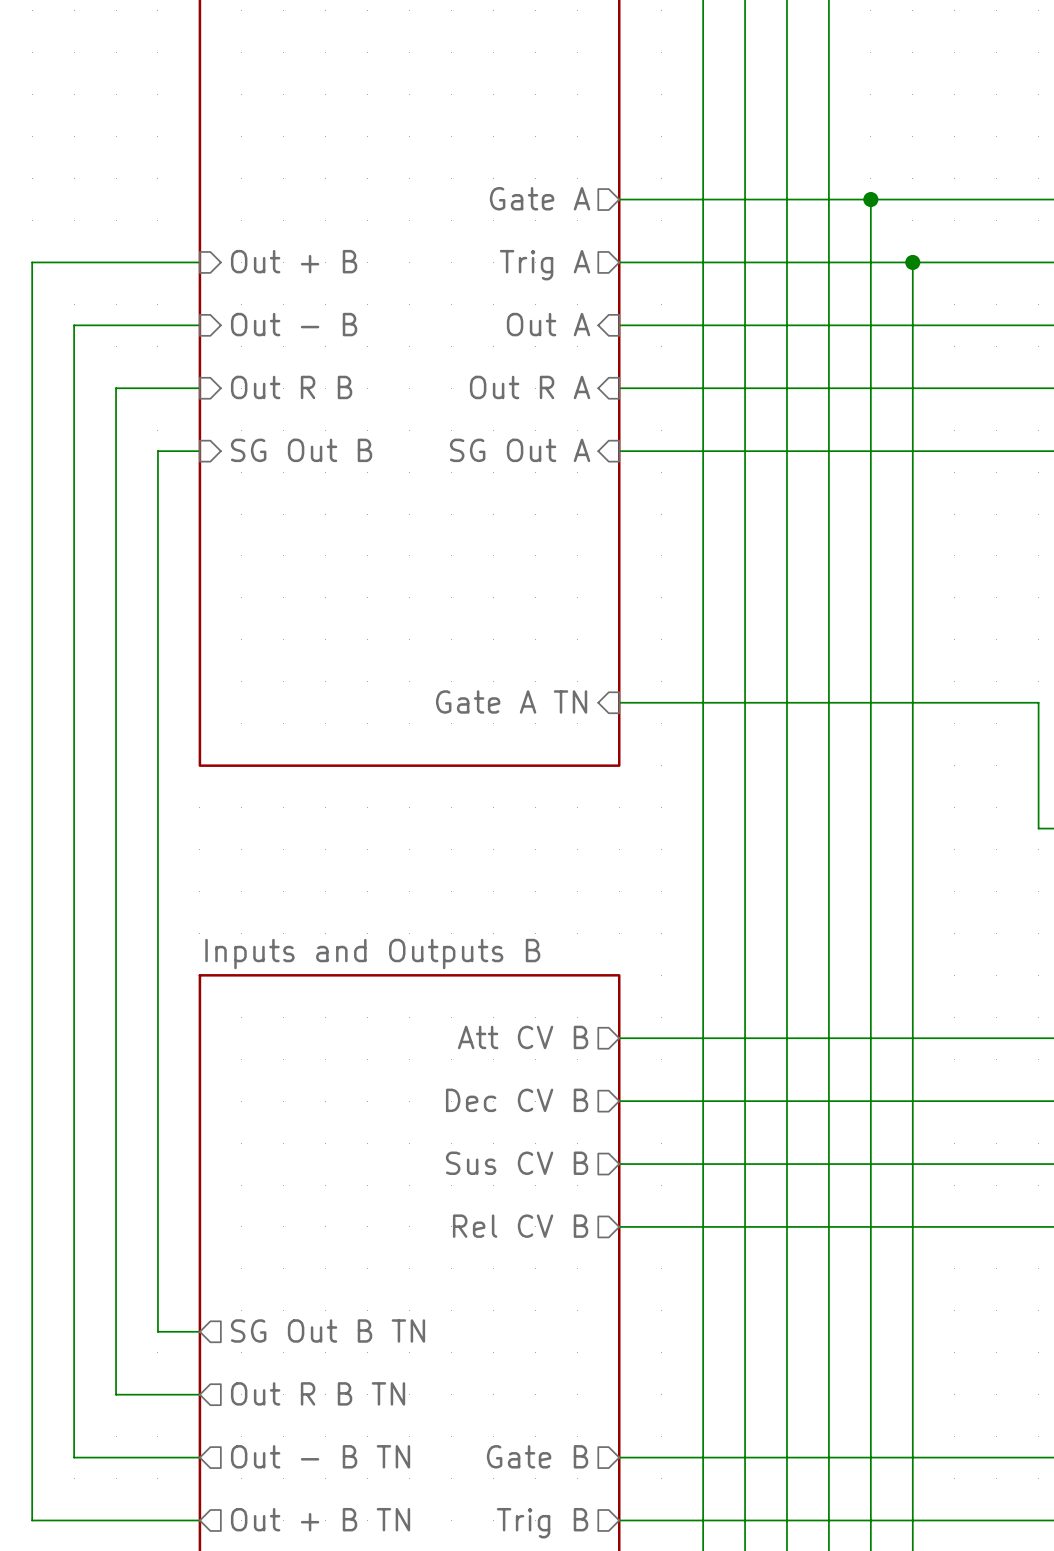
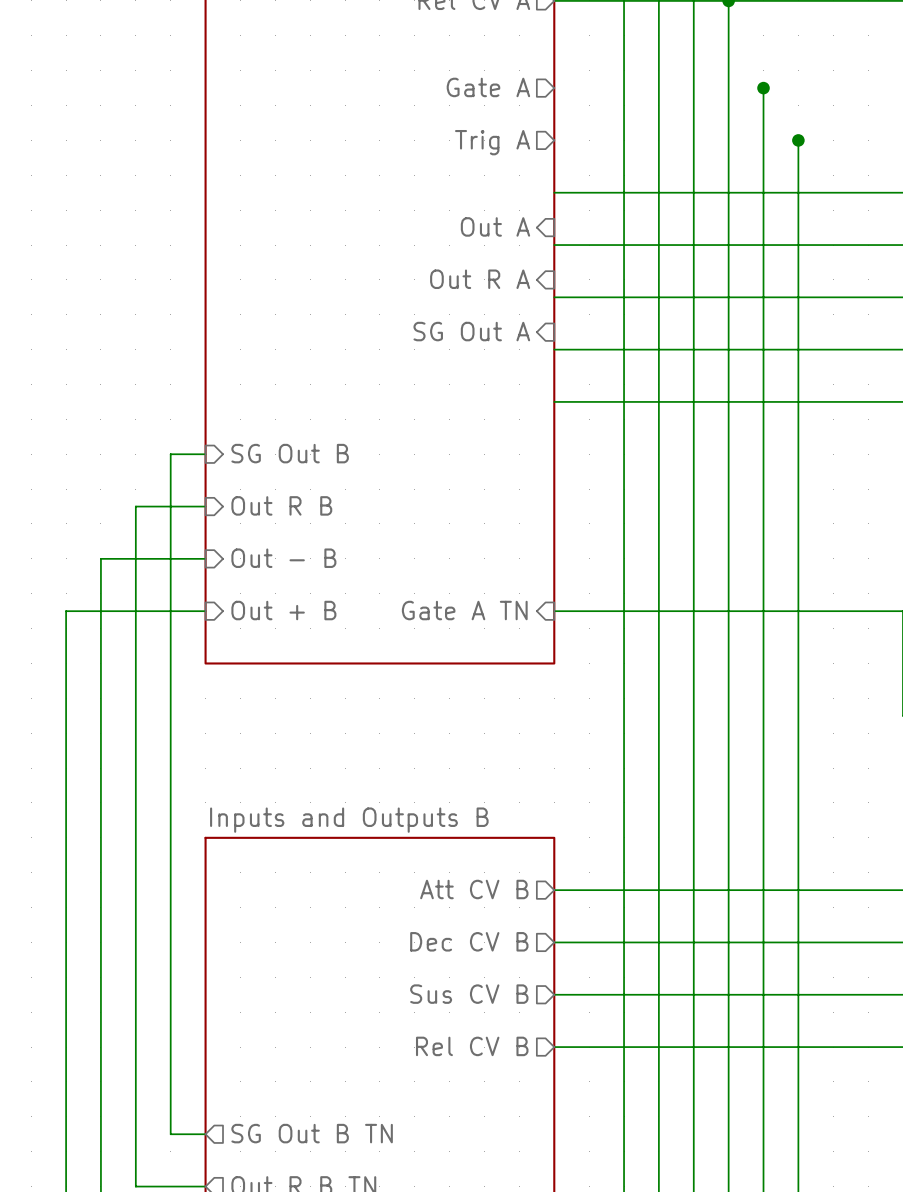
wire: none -> (763, 88) (763, 192)
junction: none -> (763, 88)
wire: none -> (798, 140) (798, 245)
junction: none -> (798, 140)
sheet pin position: Gate A (540, 198) -> Gate A (488, 87)
junction: (870, 199) -> none
sheet pin: Out + B (294, 261) -> none
wire: (199, 262) (32, 262) (32, 702) -> (205, 611) (66, 611)
junction: (912, 262) -> none
sheet pin position: Trig A (545, 265) -> Trig A (492, 142)
sheet pin position: Out - B (294, 324) -> Out - B (283, 558)
sheet pin position: Out A (548, 324) -> Out A (495, 226)
wire: (199, 325) (74, 325) (74, 639) -> (205, 558) (100, 558)
sheet pin position: Out R B (291, 387) -> Out R B (281, 505)
sheet pin position: Out R A (530, 387) -> Out R A (480, 279)
wire: (199, 388) (116, 388) (116, 576) -> (205, 506) (135, 506)
sheet pin position: SG Out B (301, 450) -> SG Out B (290, 453)
sheet pin position: SG Out A (520, 450) -> SG Out A (471, 331)
wire: (199, 451) (157, 451) (157, 514) -> (205, 454) (170, 454)
sheet pin: none -> Out + B (283, 610)

